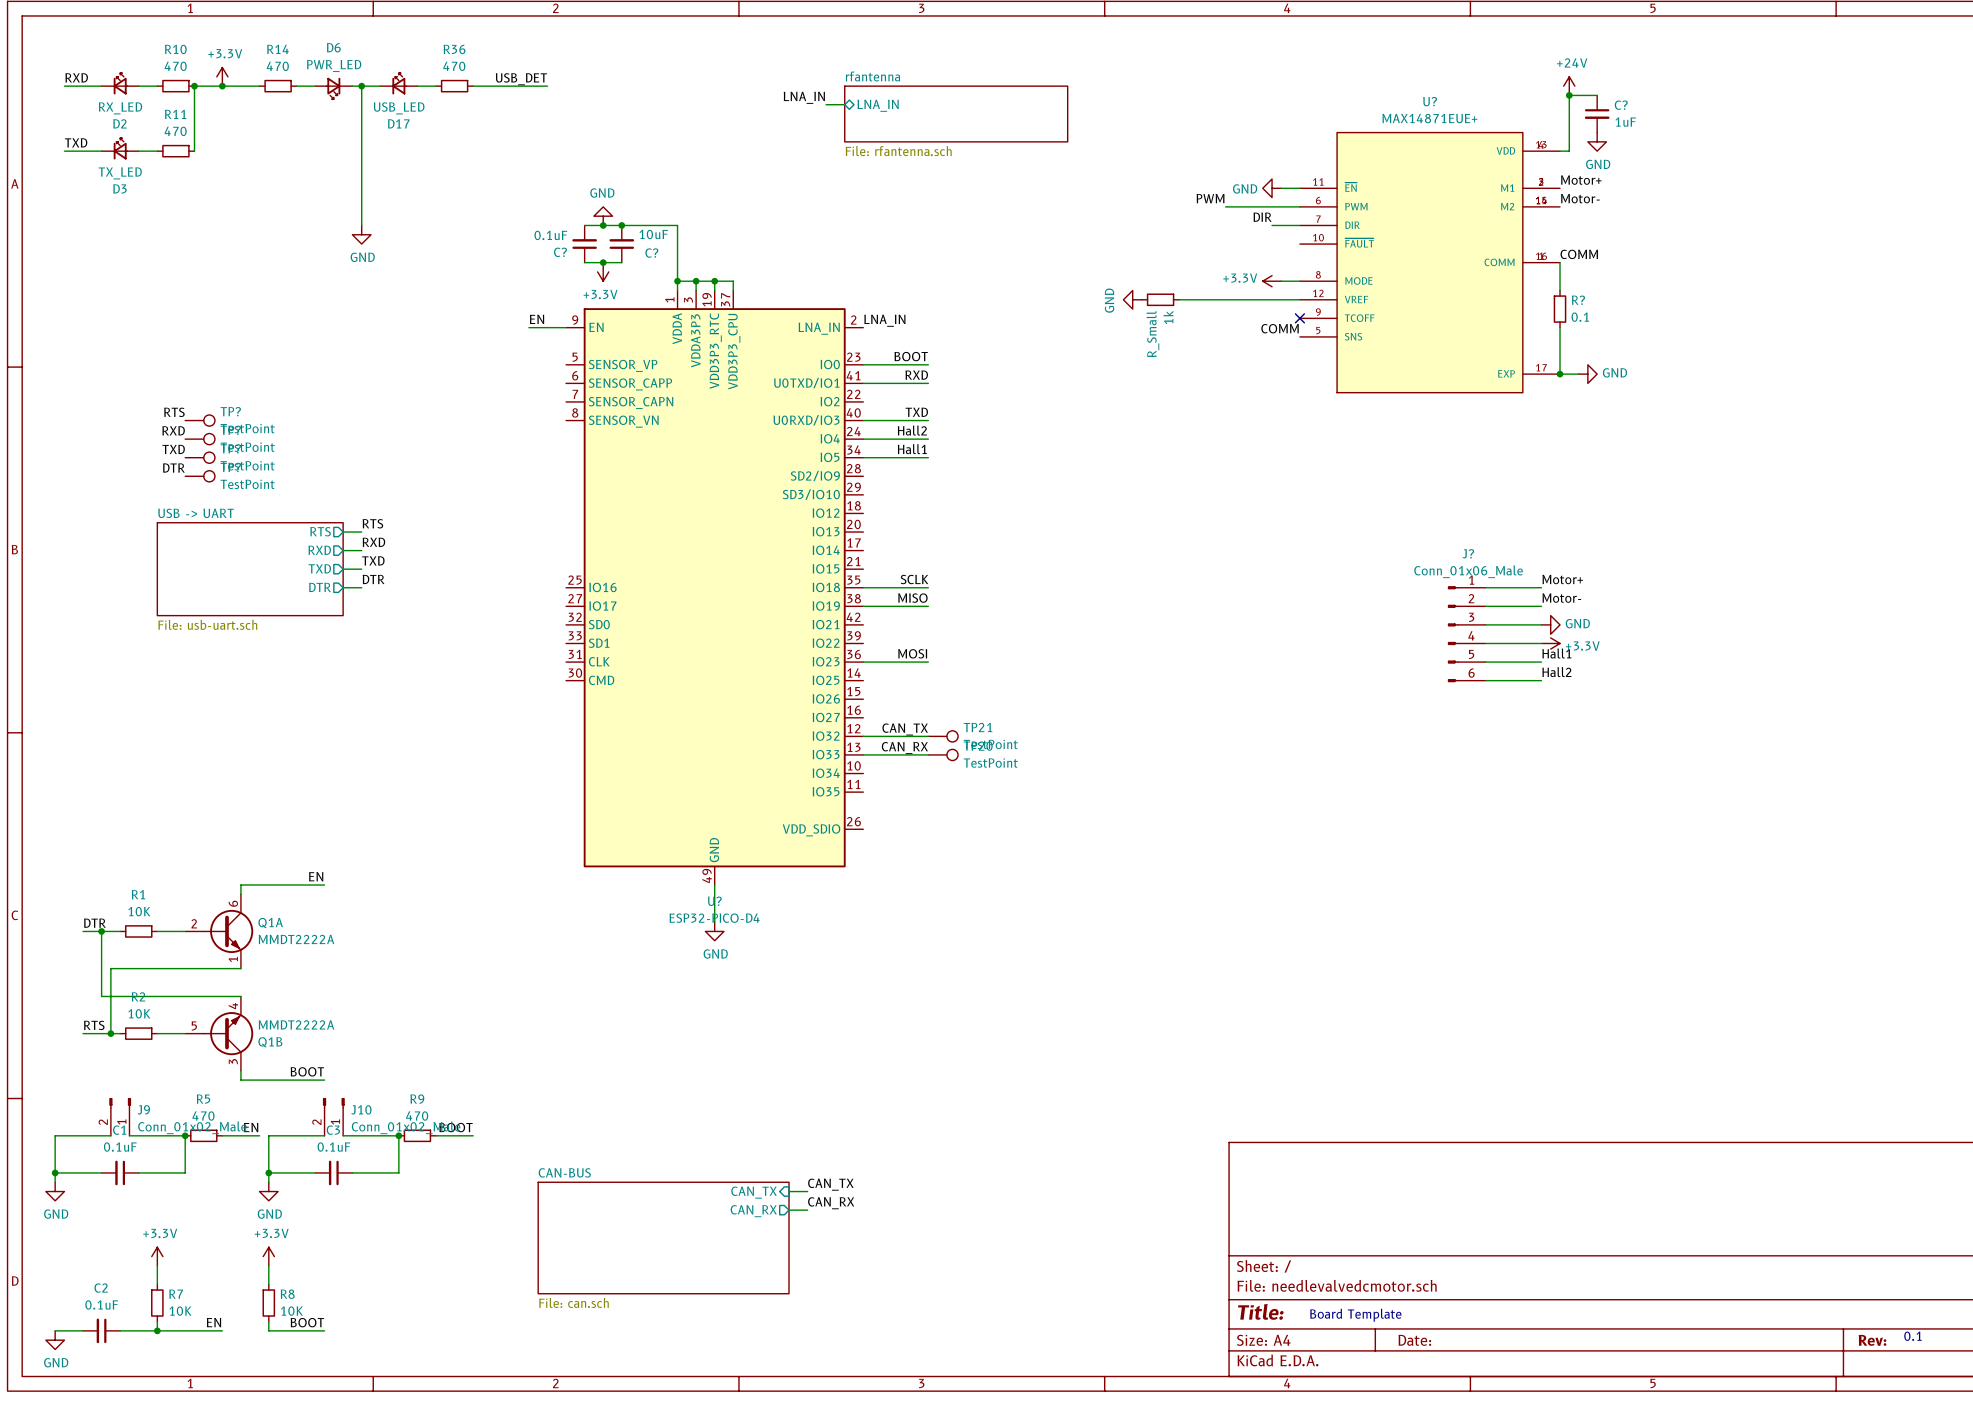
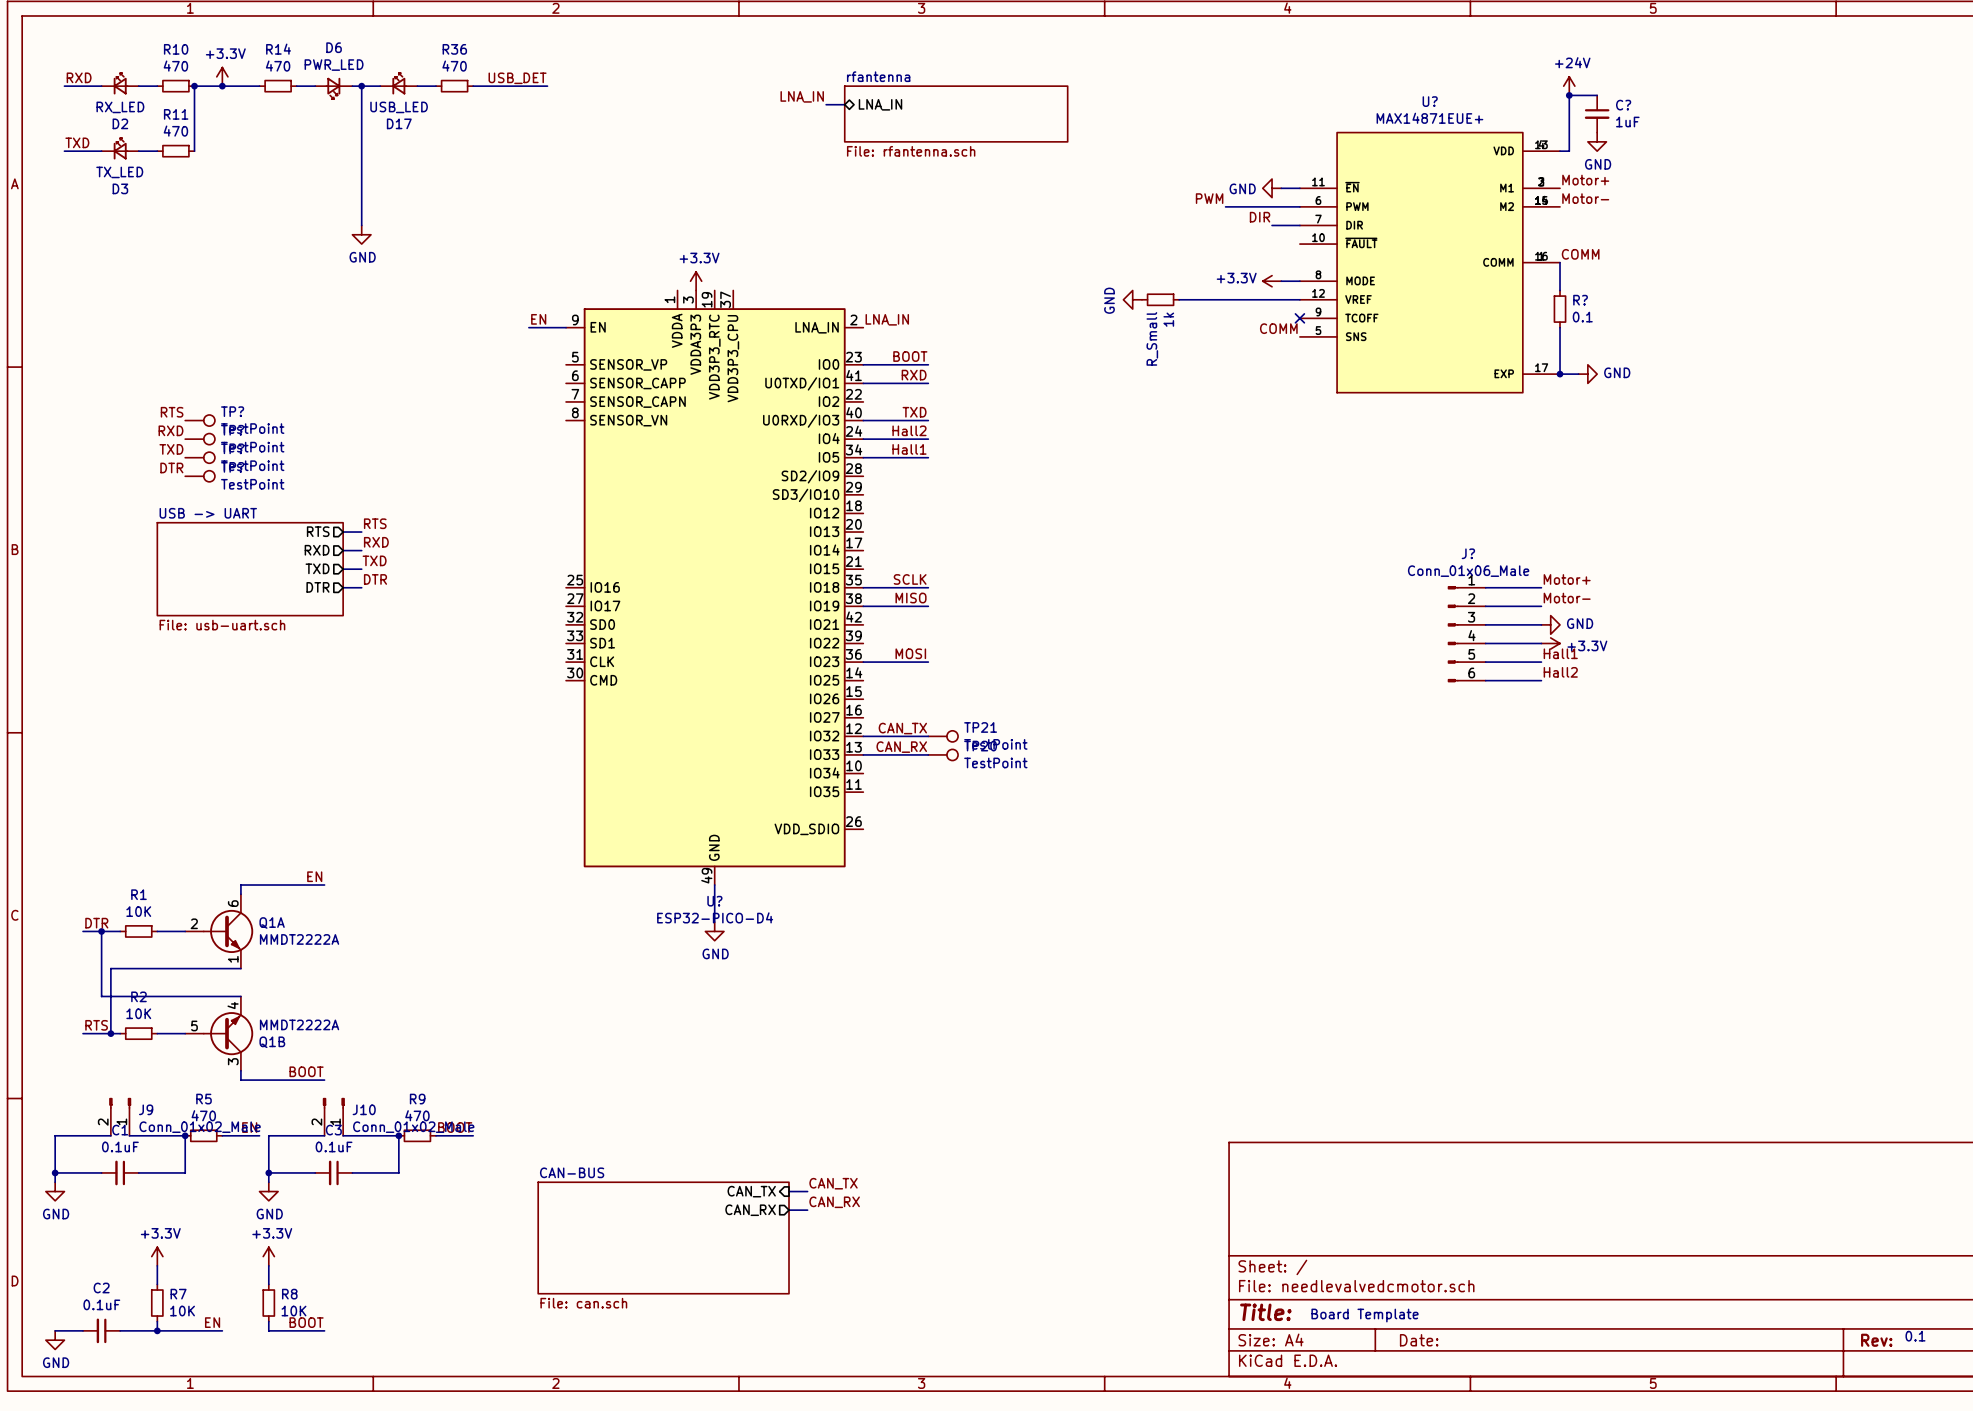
power symbol: GND (603, 216) -> none
wire: (584, 225) (677, 225) (677, 290) -> none
junction: (603, 225) -> none
junction: (621, 225) -> none
C?: 0.1uF (584, 244) -> none
C?: 10uF (621, 244) -> none
wire: (584, 262) (621, 262) -> none
junction: (603, 262) -> none
power symbol rotation: 0° (603, 271) -> 180° (696, 281)
power symbol position: +3.3V (603, 271) -> +3.3V (696, 281)
wire: (677, 281) (733, 281) (733, 290) -> none
junction: (677, 281) -> none
junction: (696, 281) -> none
wire: (714, 281) (714, 290) -> none
junction: (714, 281) -> none

